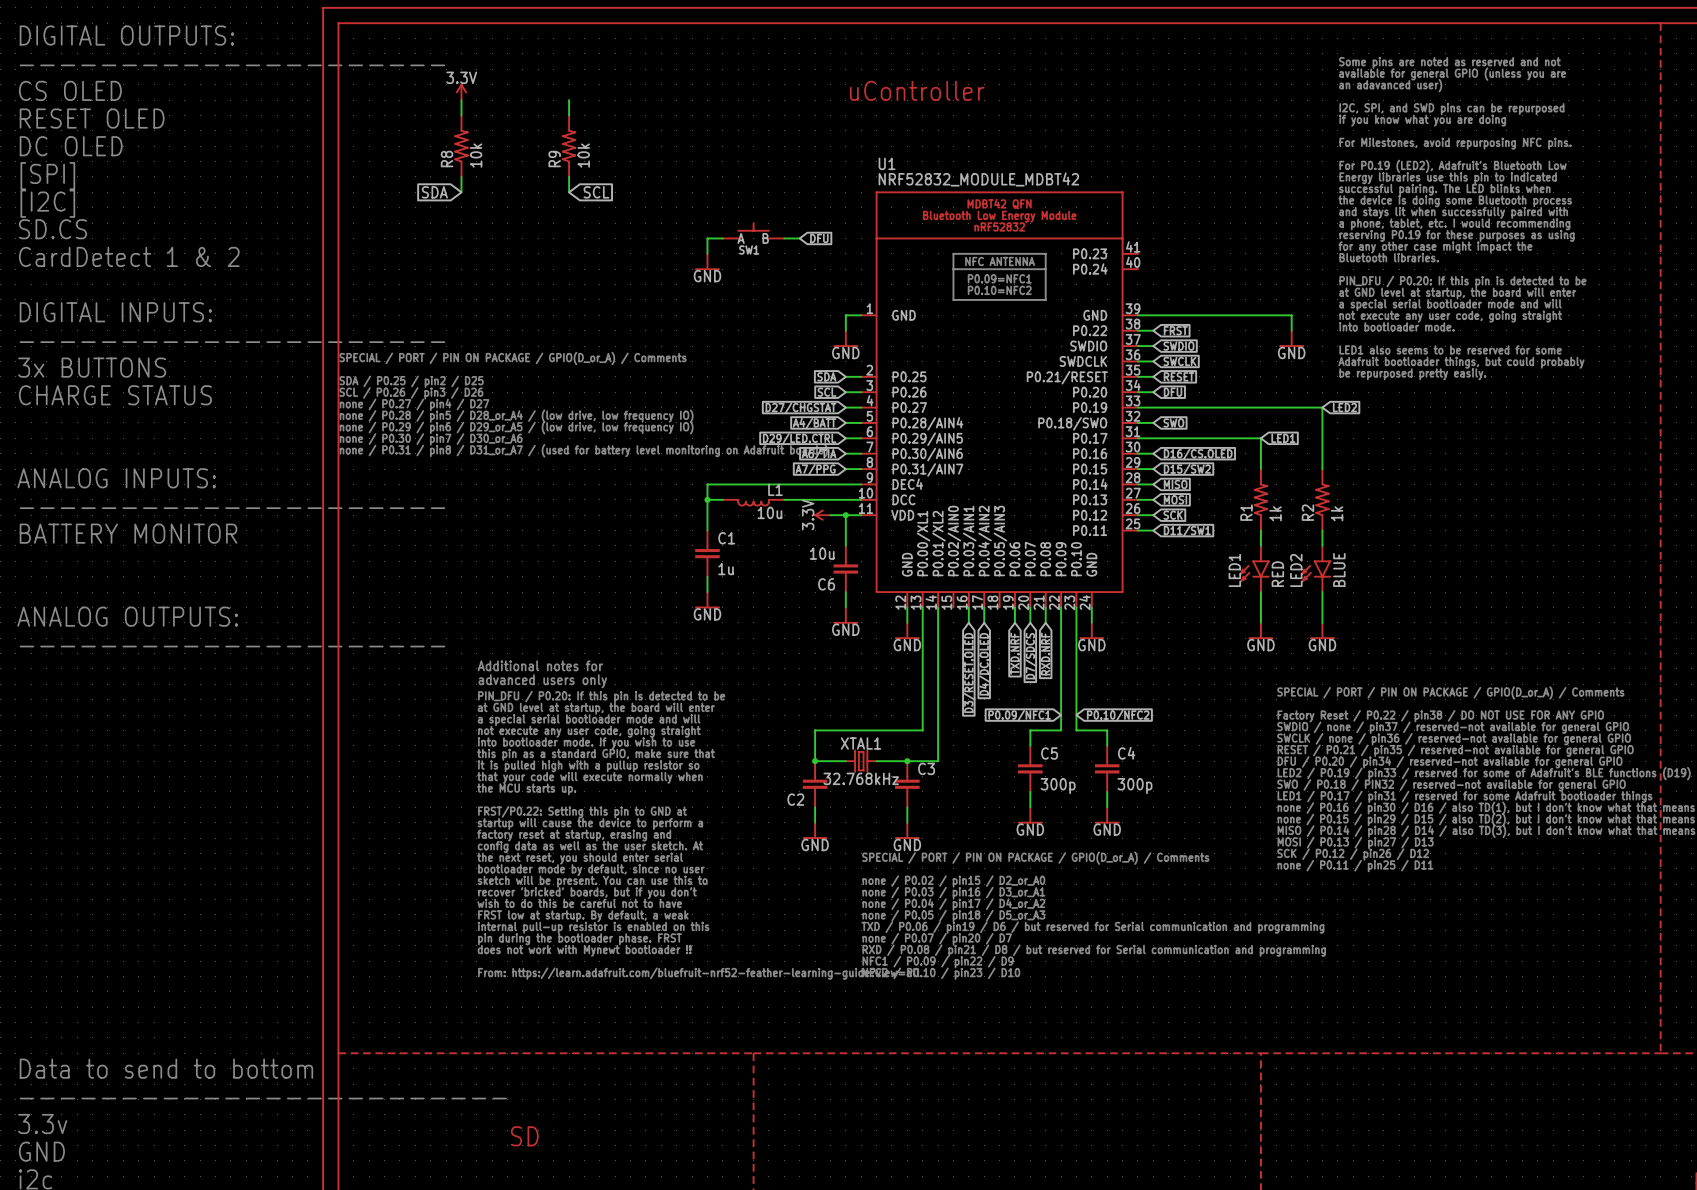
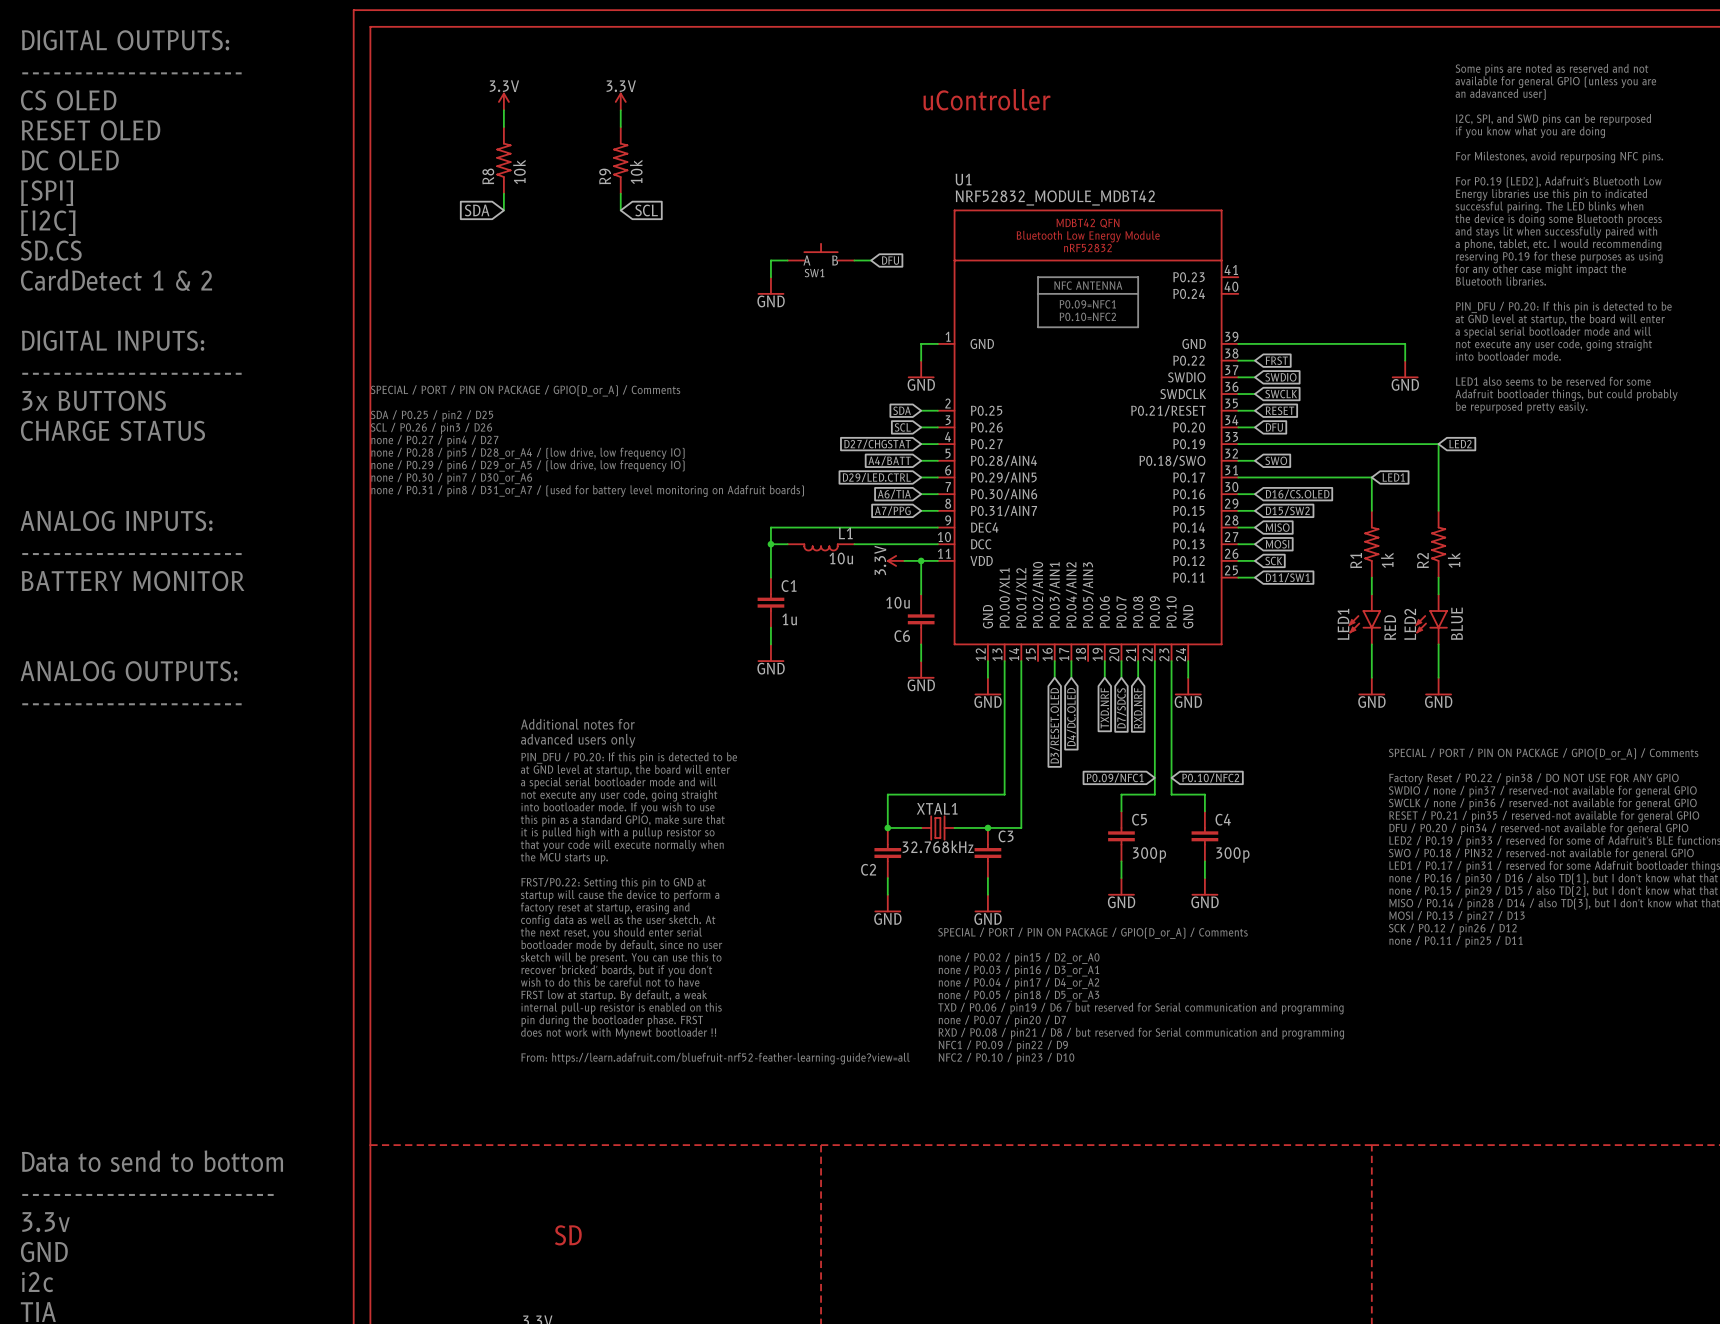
power symbol: none -> 3.3V (620, 101)

